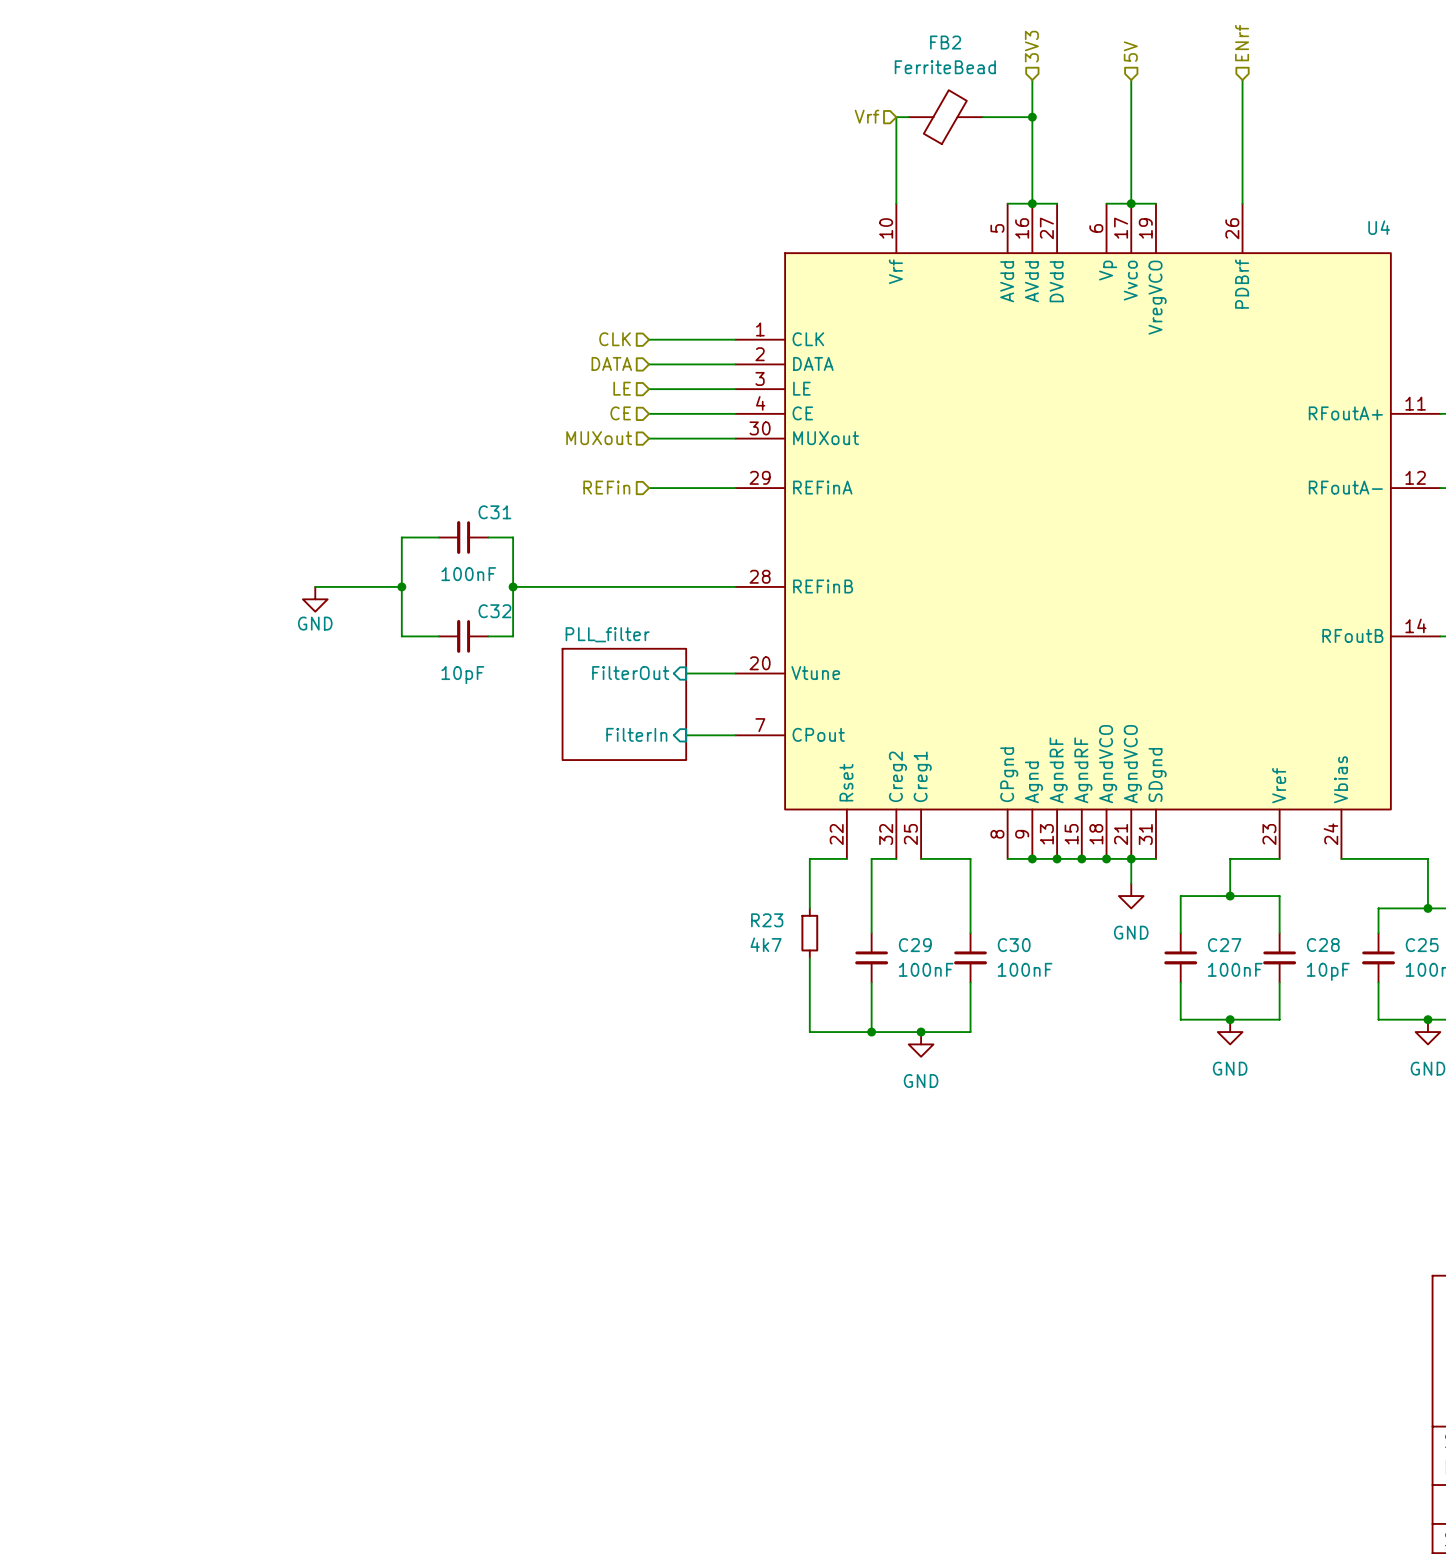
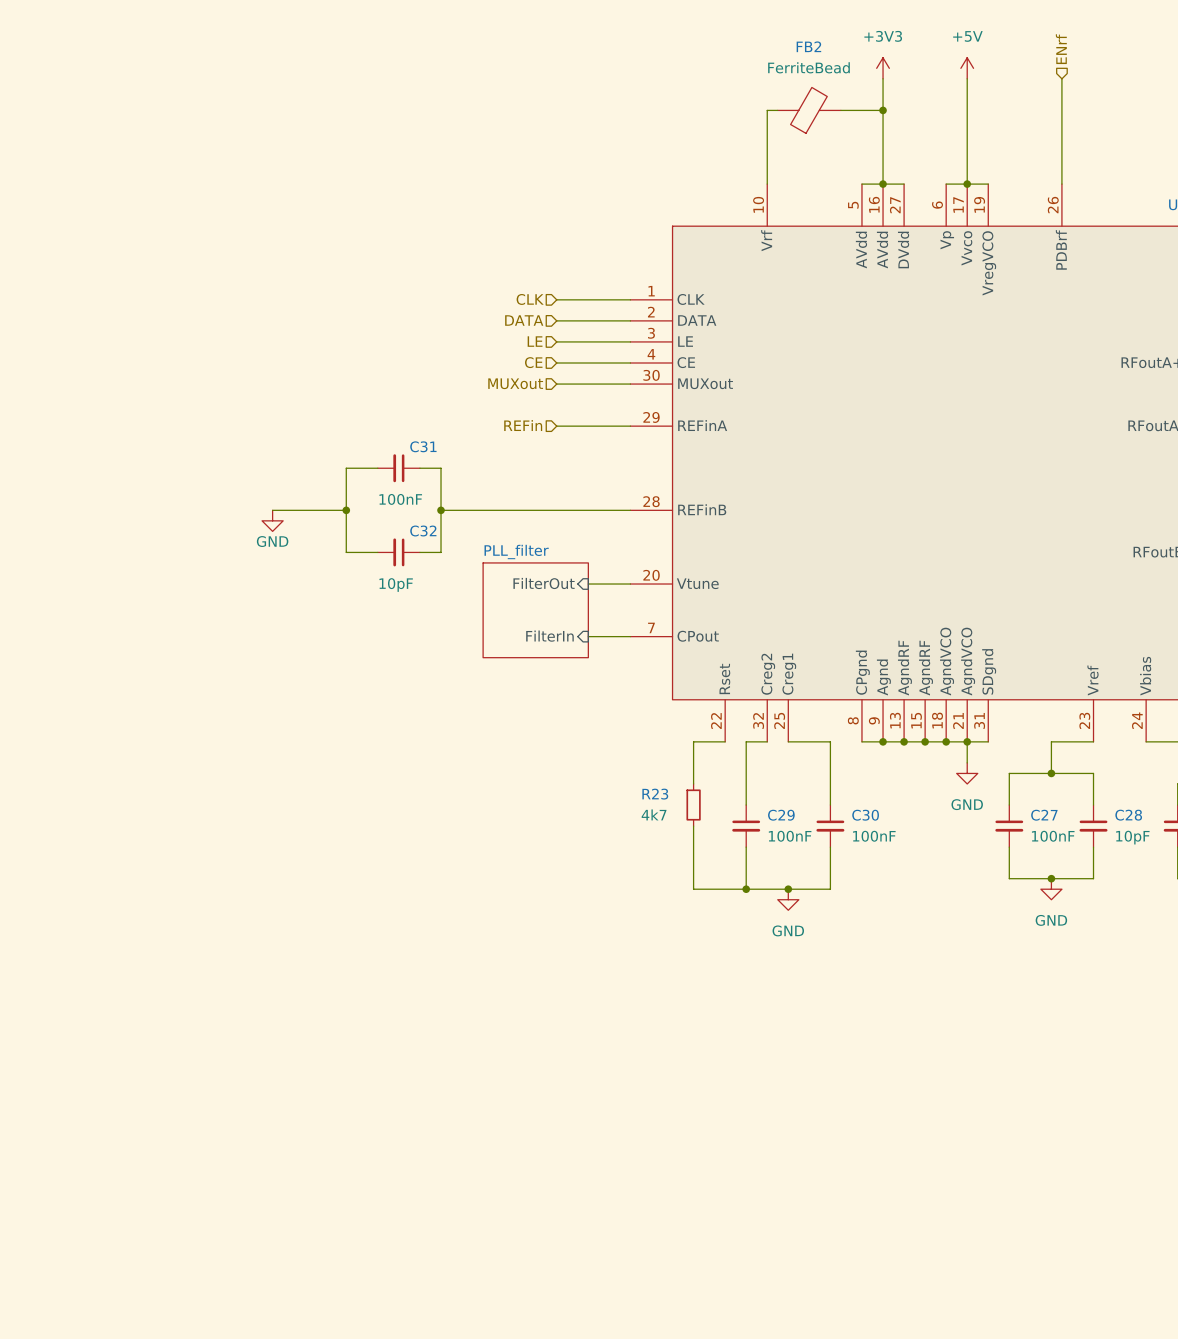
hierarchical label: 3V3 (1031, 46) -> none
hierarchical label: 5V (1130, 51) -> none
power symbol: none -> +3V3 (883, 68)
power symbol: none -> +5V (967, 68)
hierarchical label: Vrf (867, 116) -> none

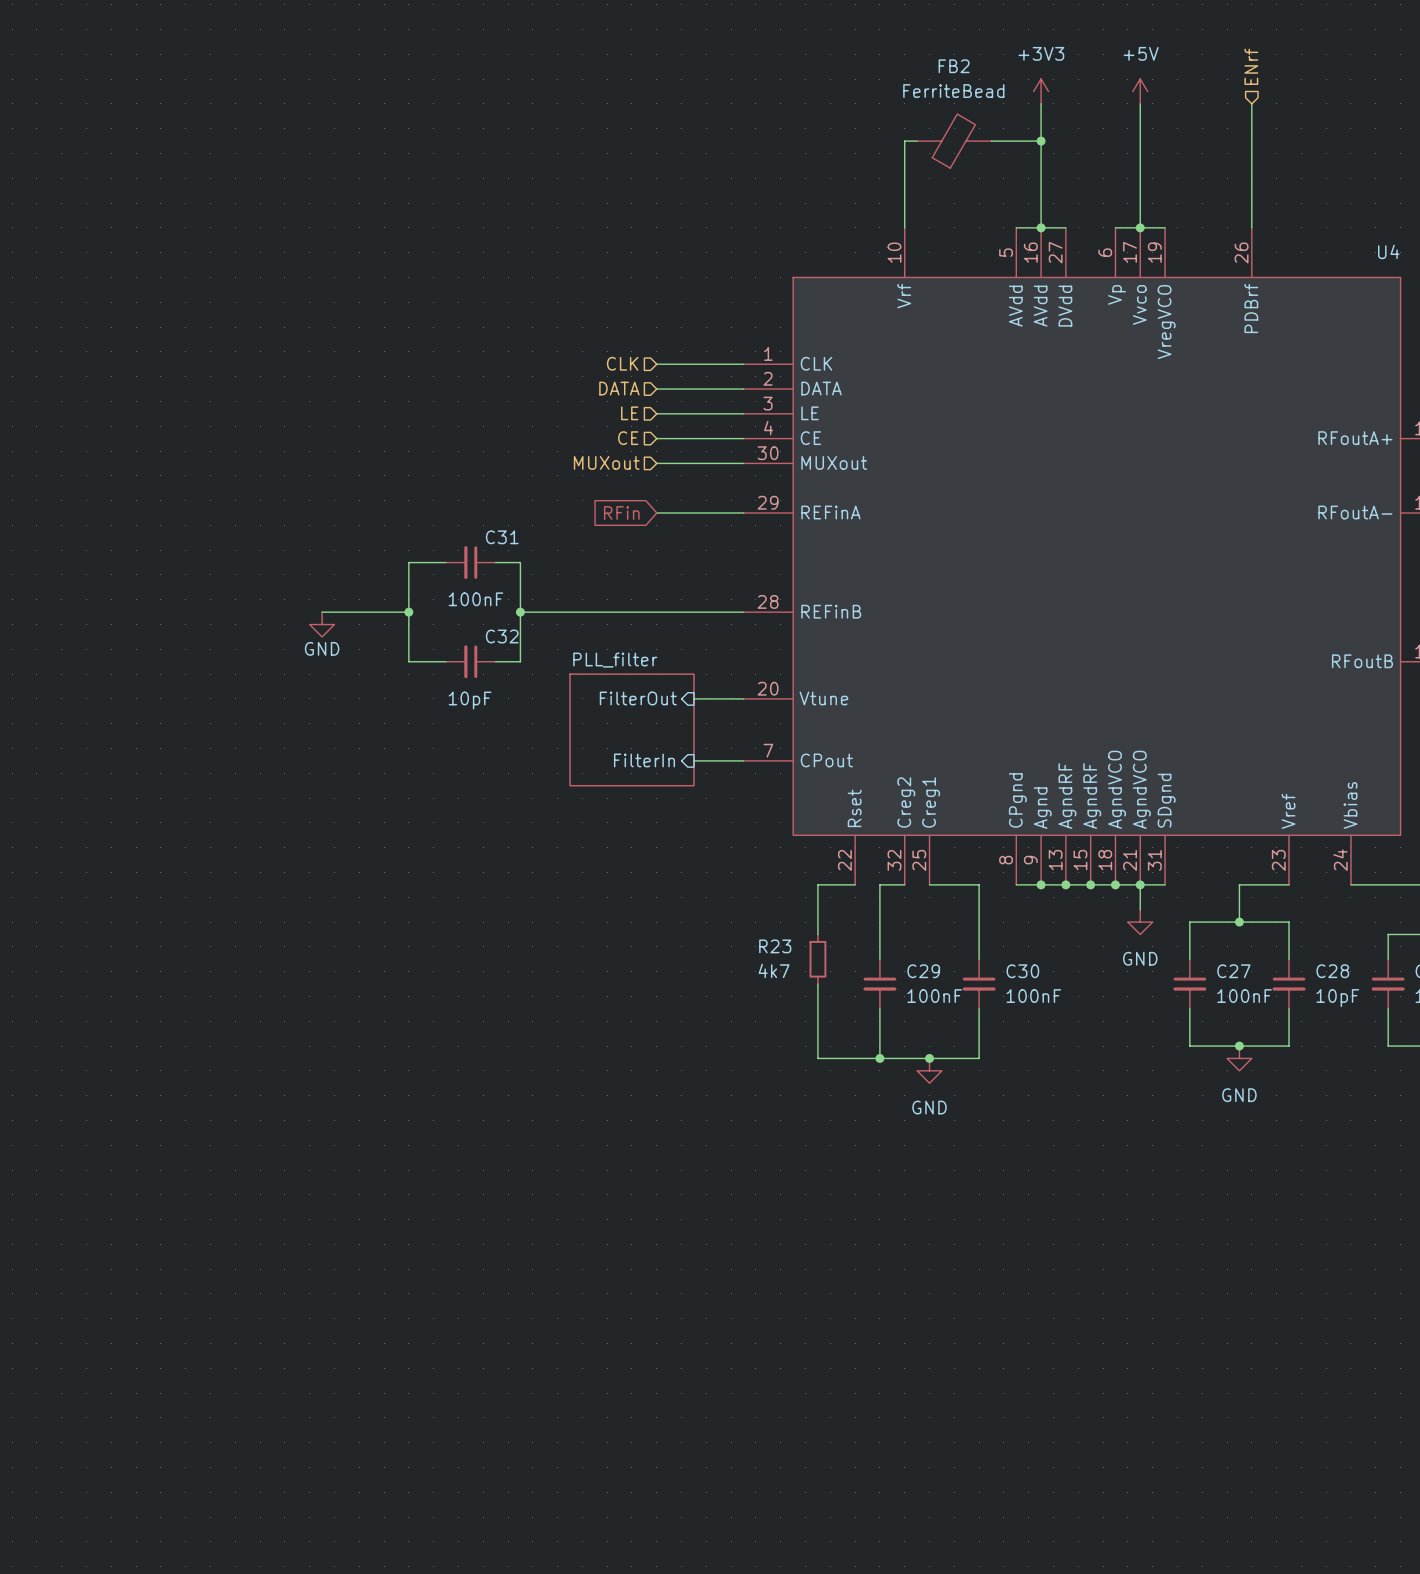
hierarchical label: REFin (523, 425) -> none
global label: none -> RFin (621, 512)

